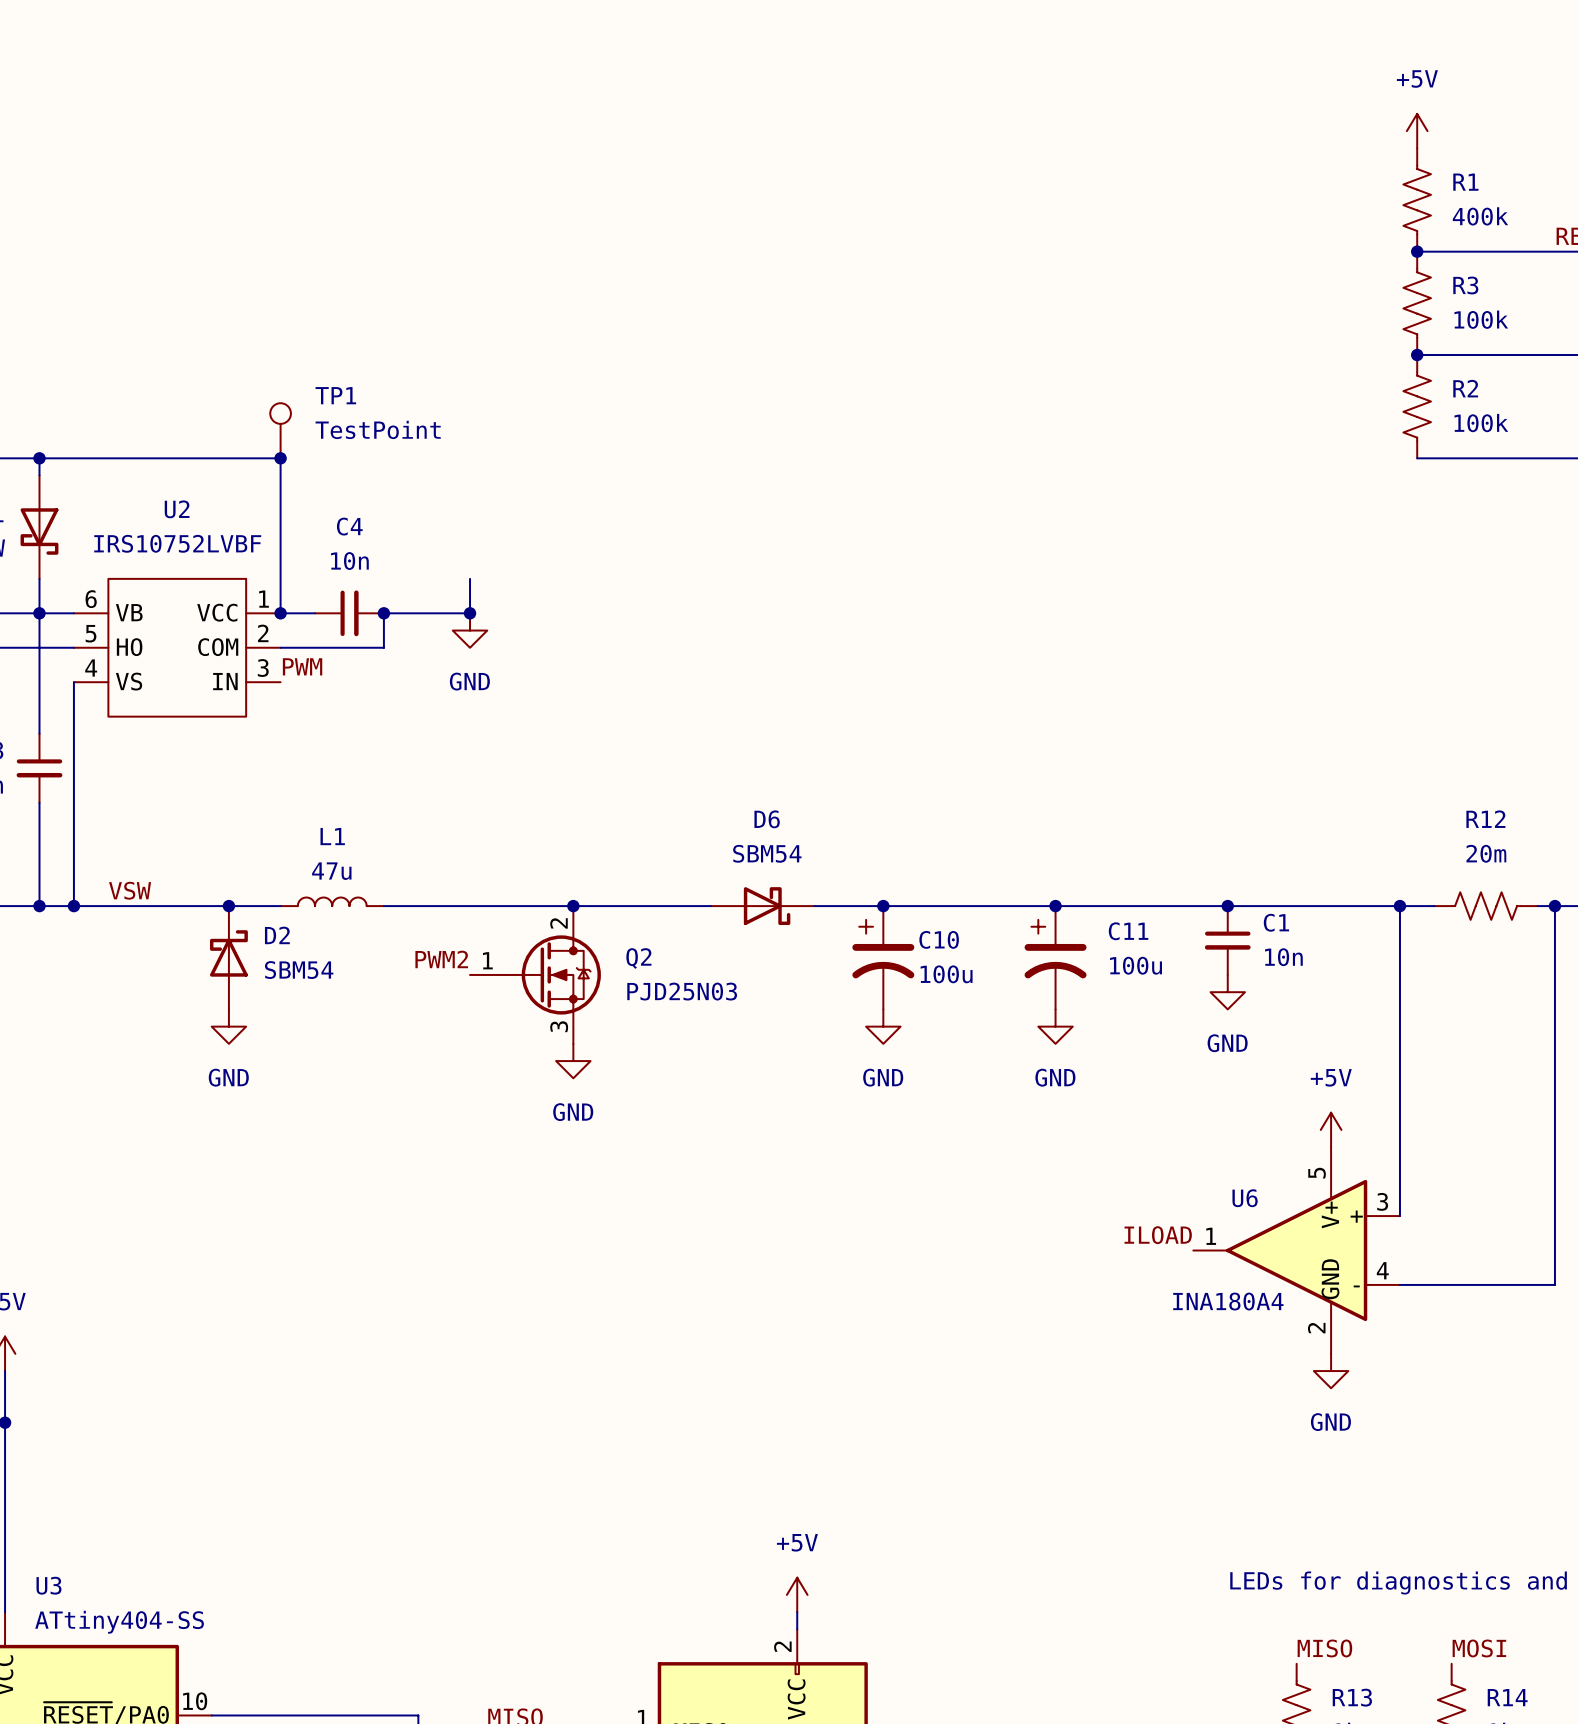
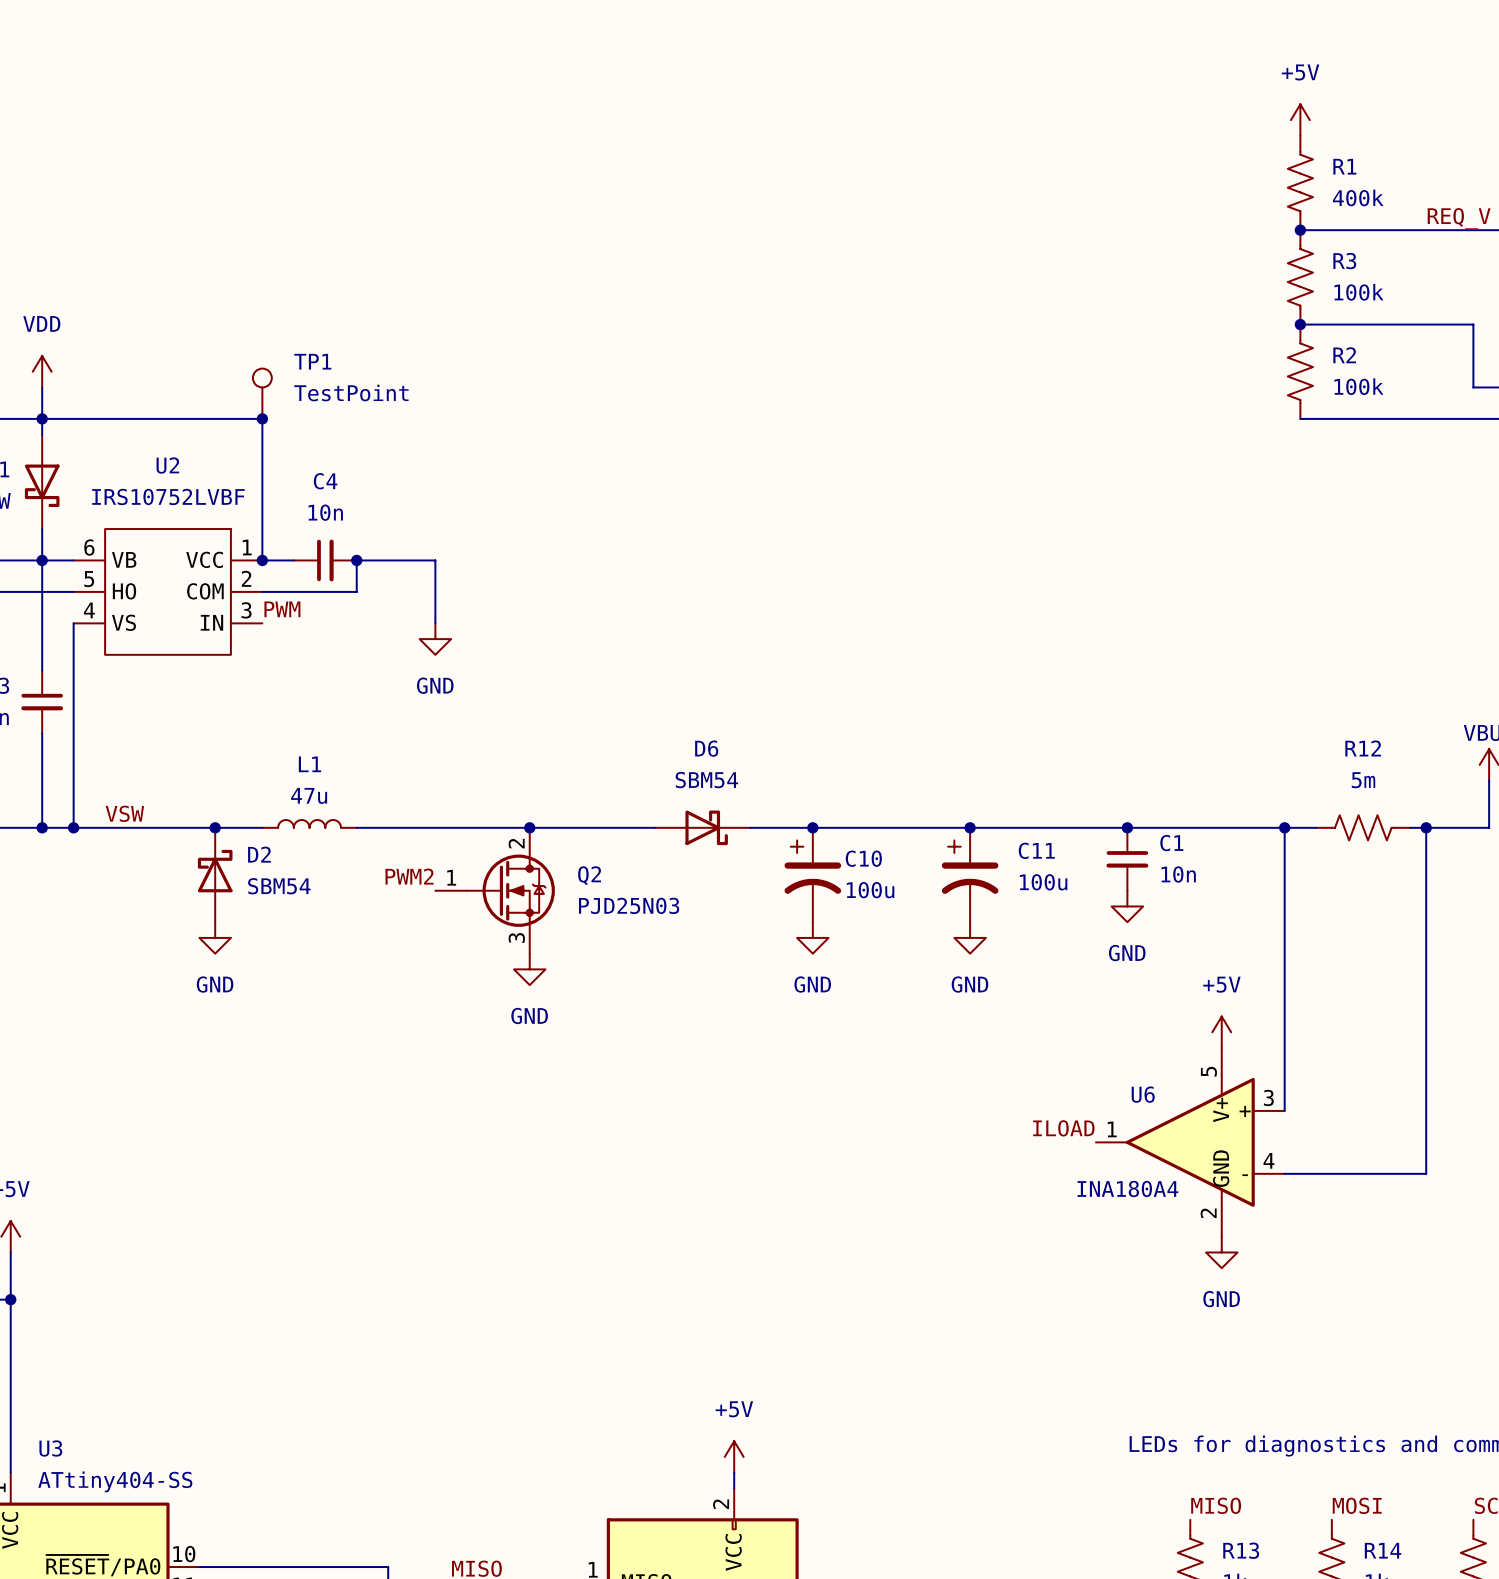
power symbol: none -> VDD (42, 371)
wire: none -> (42, 387) (42, 418)
wire: (470, 578) (470, 613) -> (435, 623) (435, 560)
junction: (470, 613) -> none
power symbol position: GND (470, 630) -> GND (435, 639)
R12 value: 20m (1486, 853) -> 5m (1363, 780)

